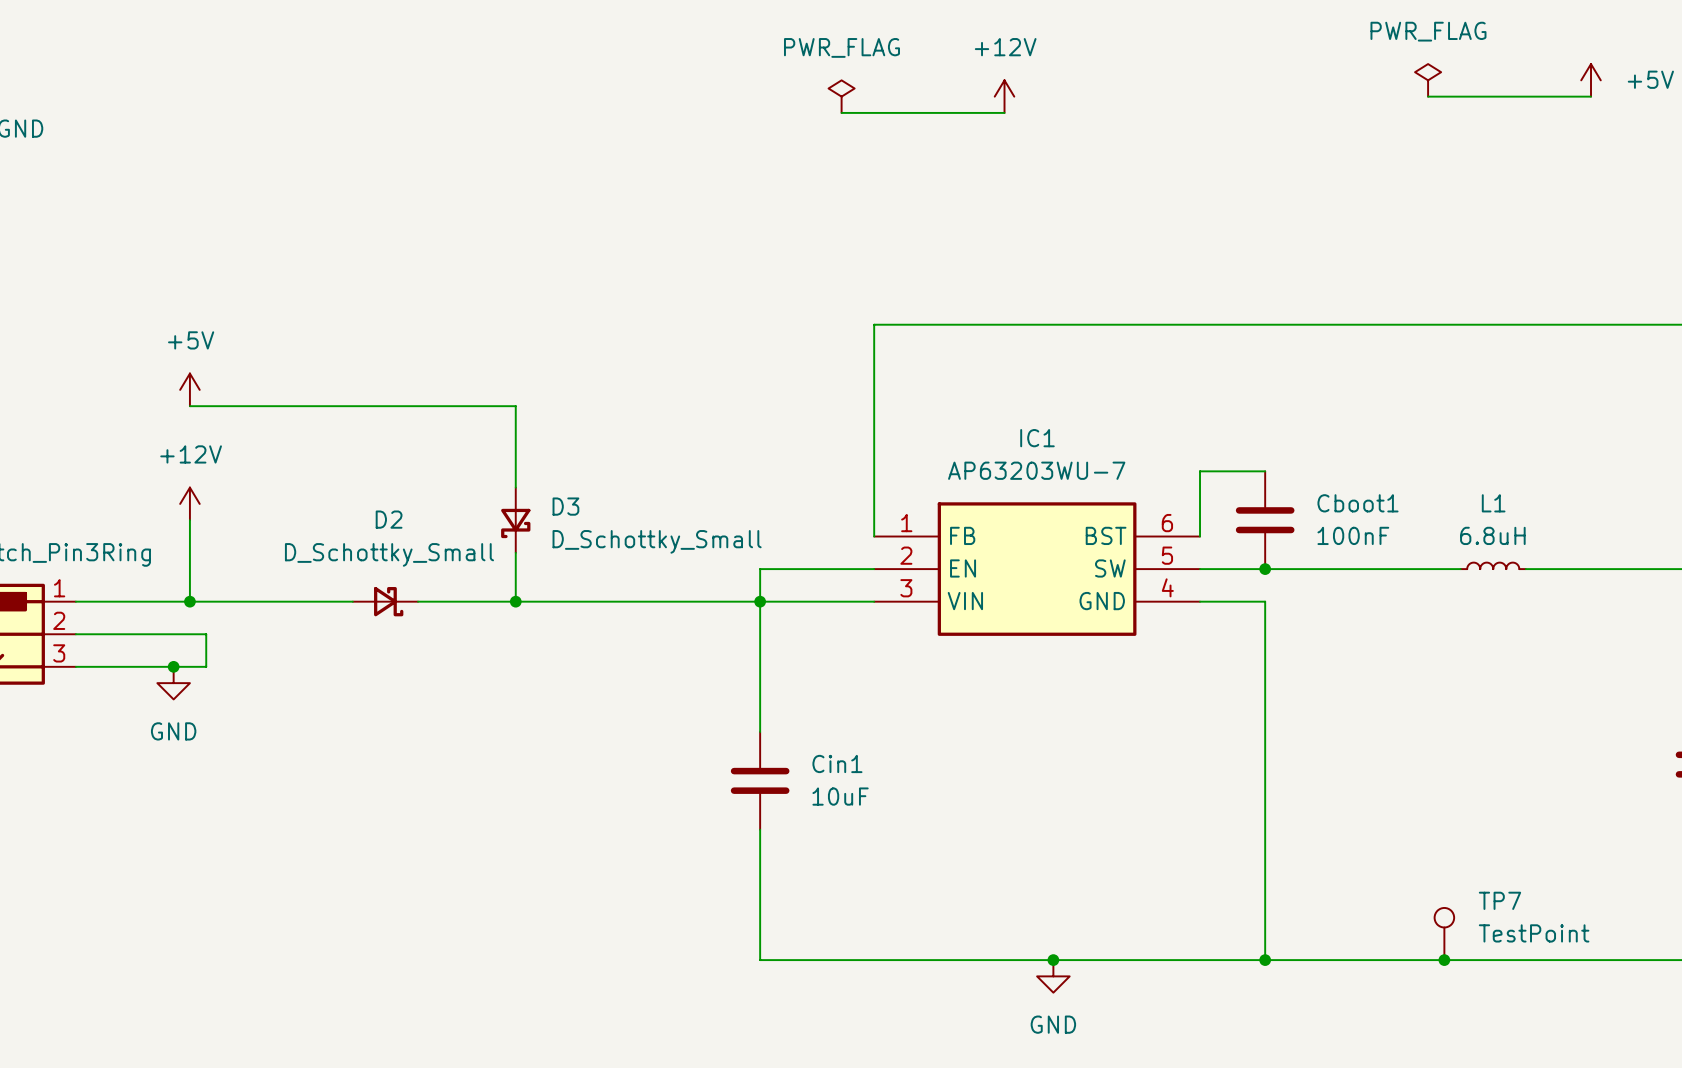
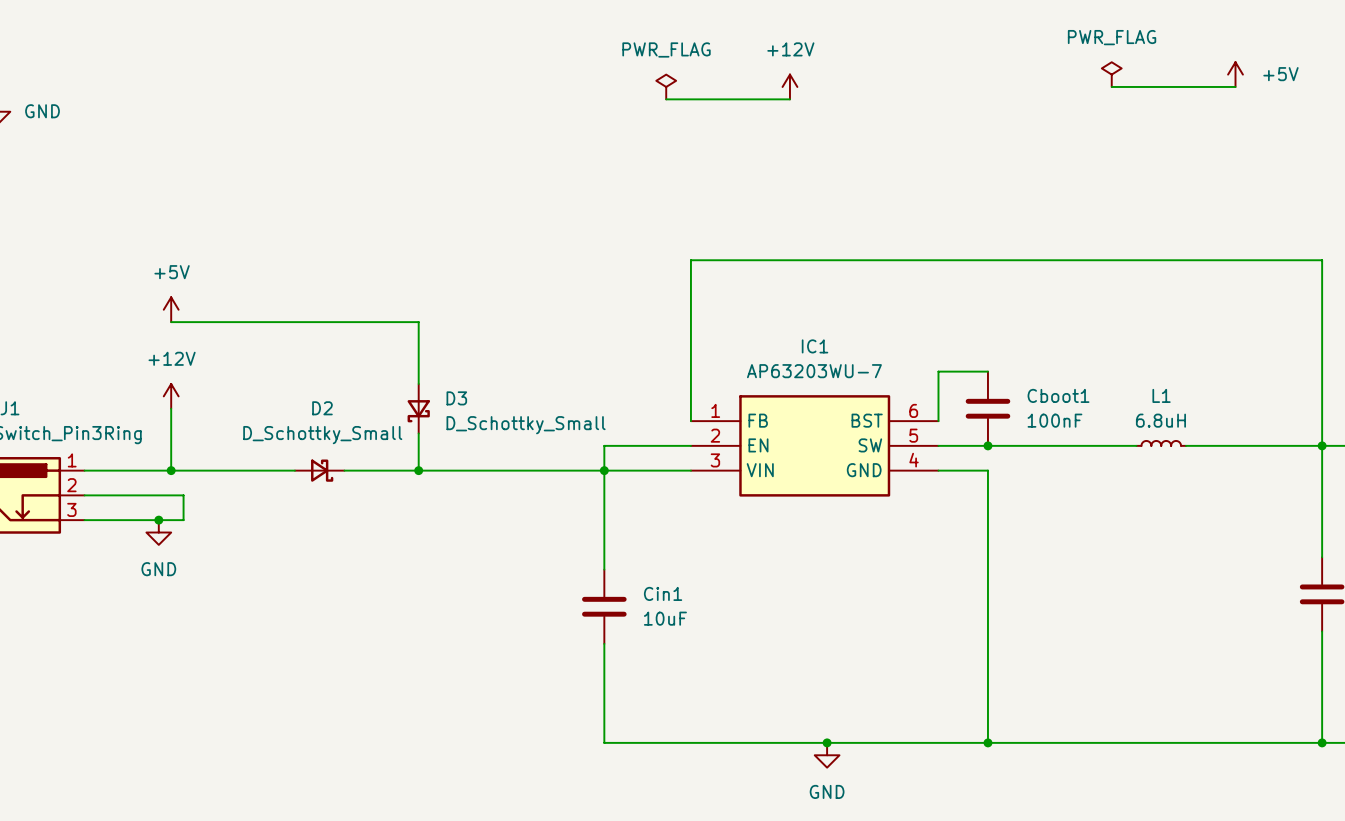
TP7: TestPoint (1444, 934) -> none
junction: (1444, 960) -> none

